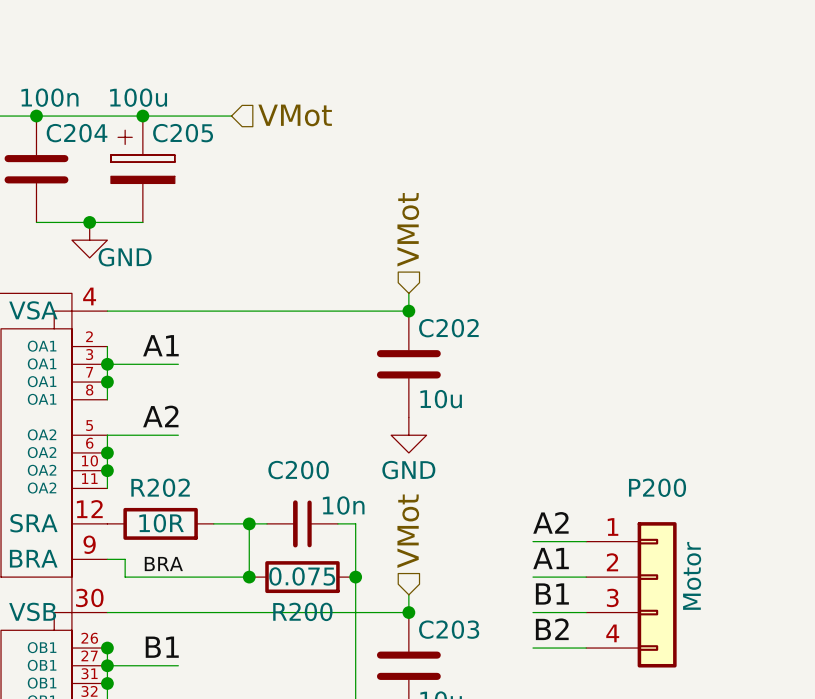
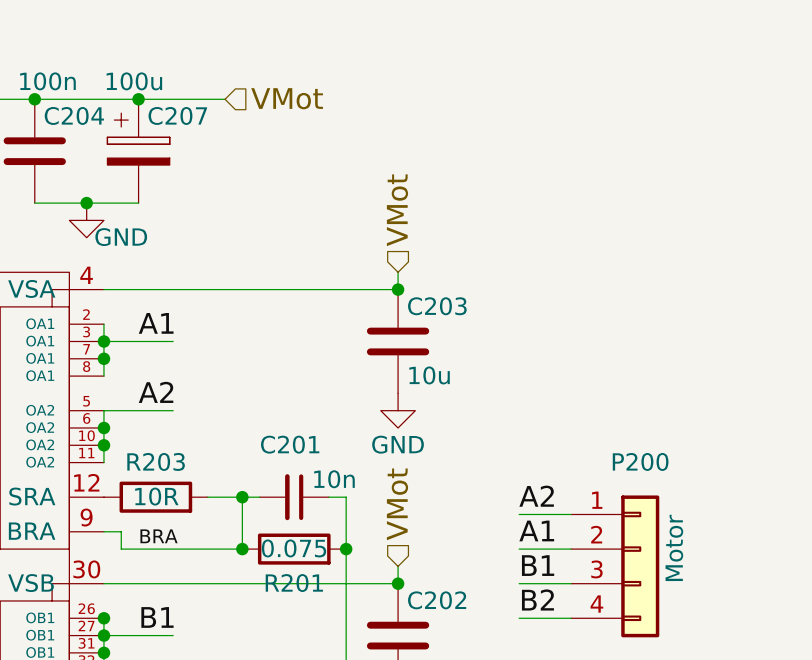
C205 name: C205 (183, 133) -> C207 (177, 115)
C202 name: C202 (448, 328) -> C203 (437, 306)
C200 name: C200 (298, 470) -> C201 (290, 444)
R202 name: R202 (160, 487) -> R203 (156, 461)
R200 name: R200 (302, 611) -> R201 (294, 583)
C203 name: C203 (449, 629) -> C202 (437, 600)

